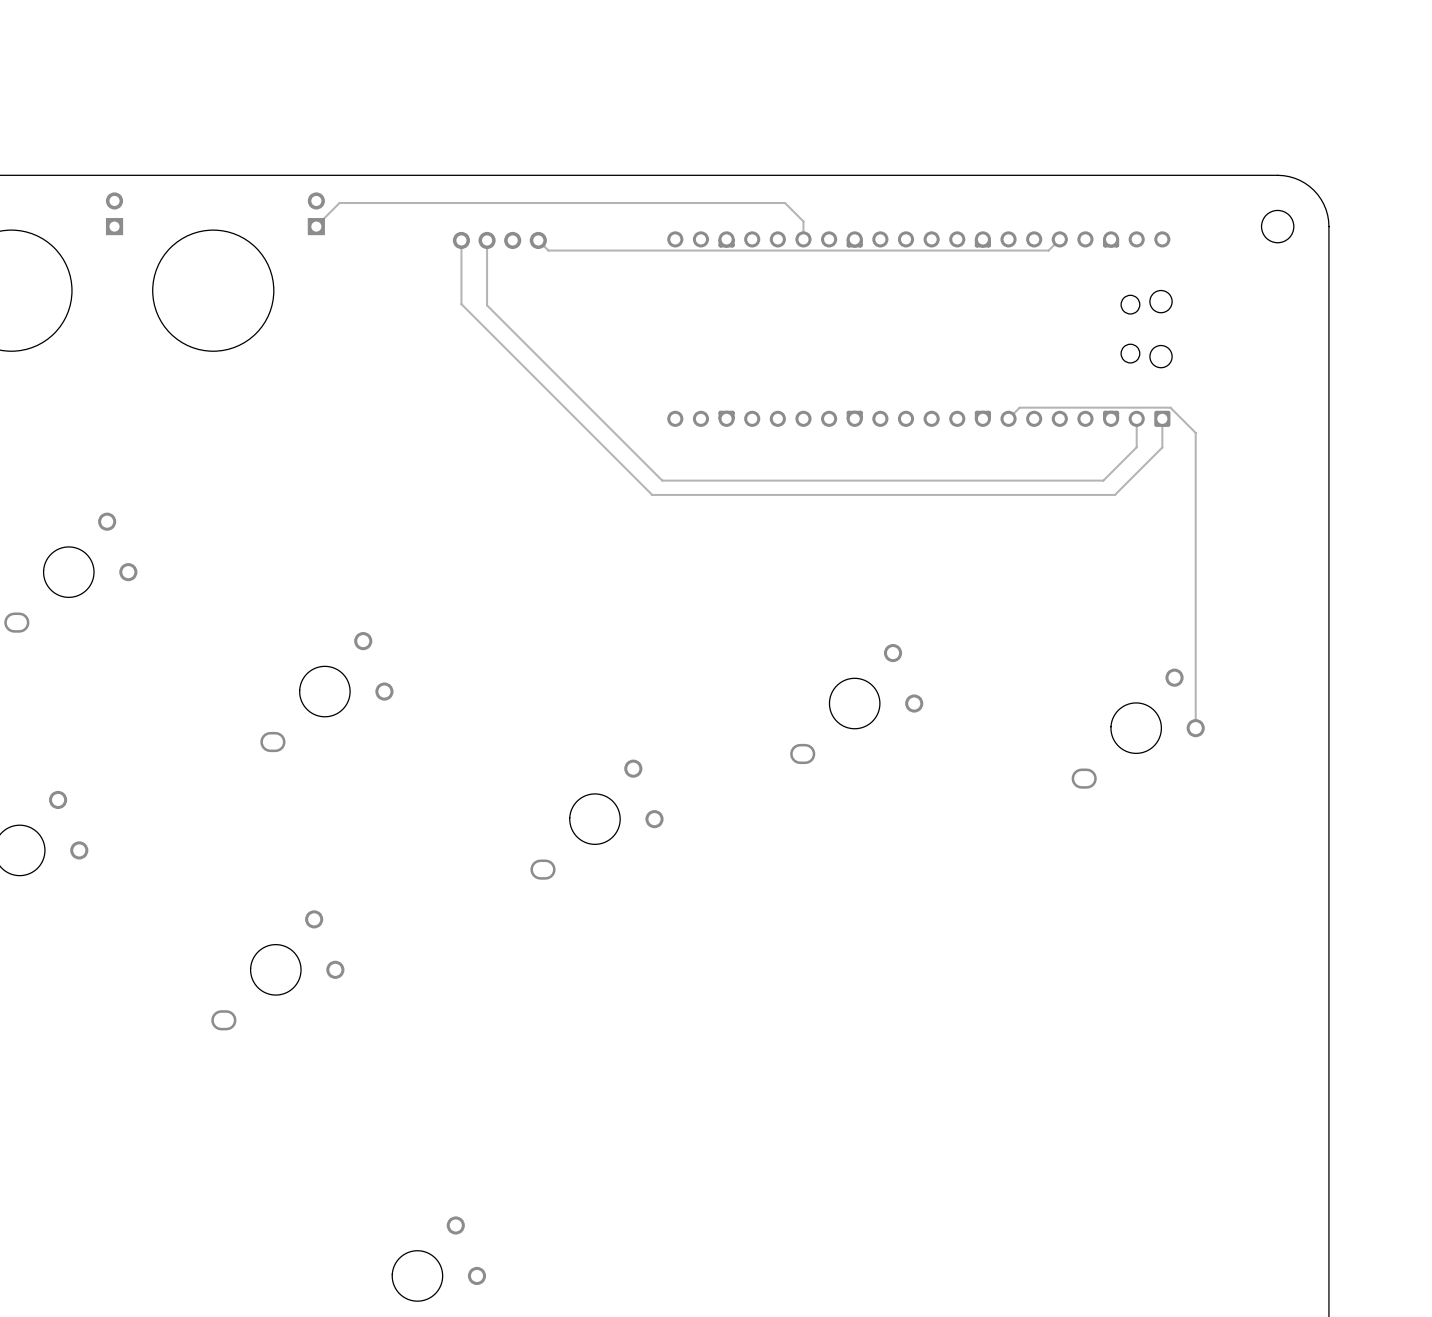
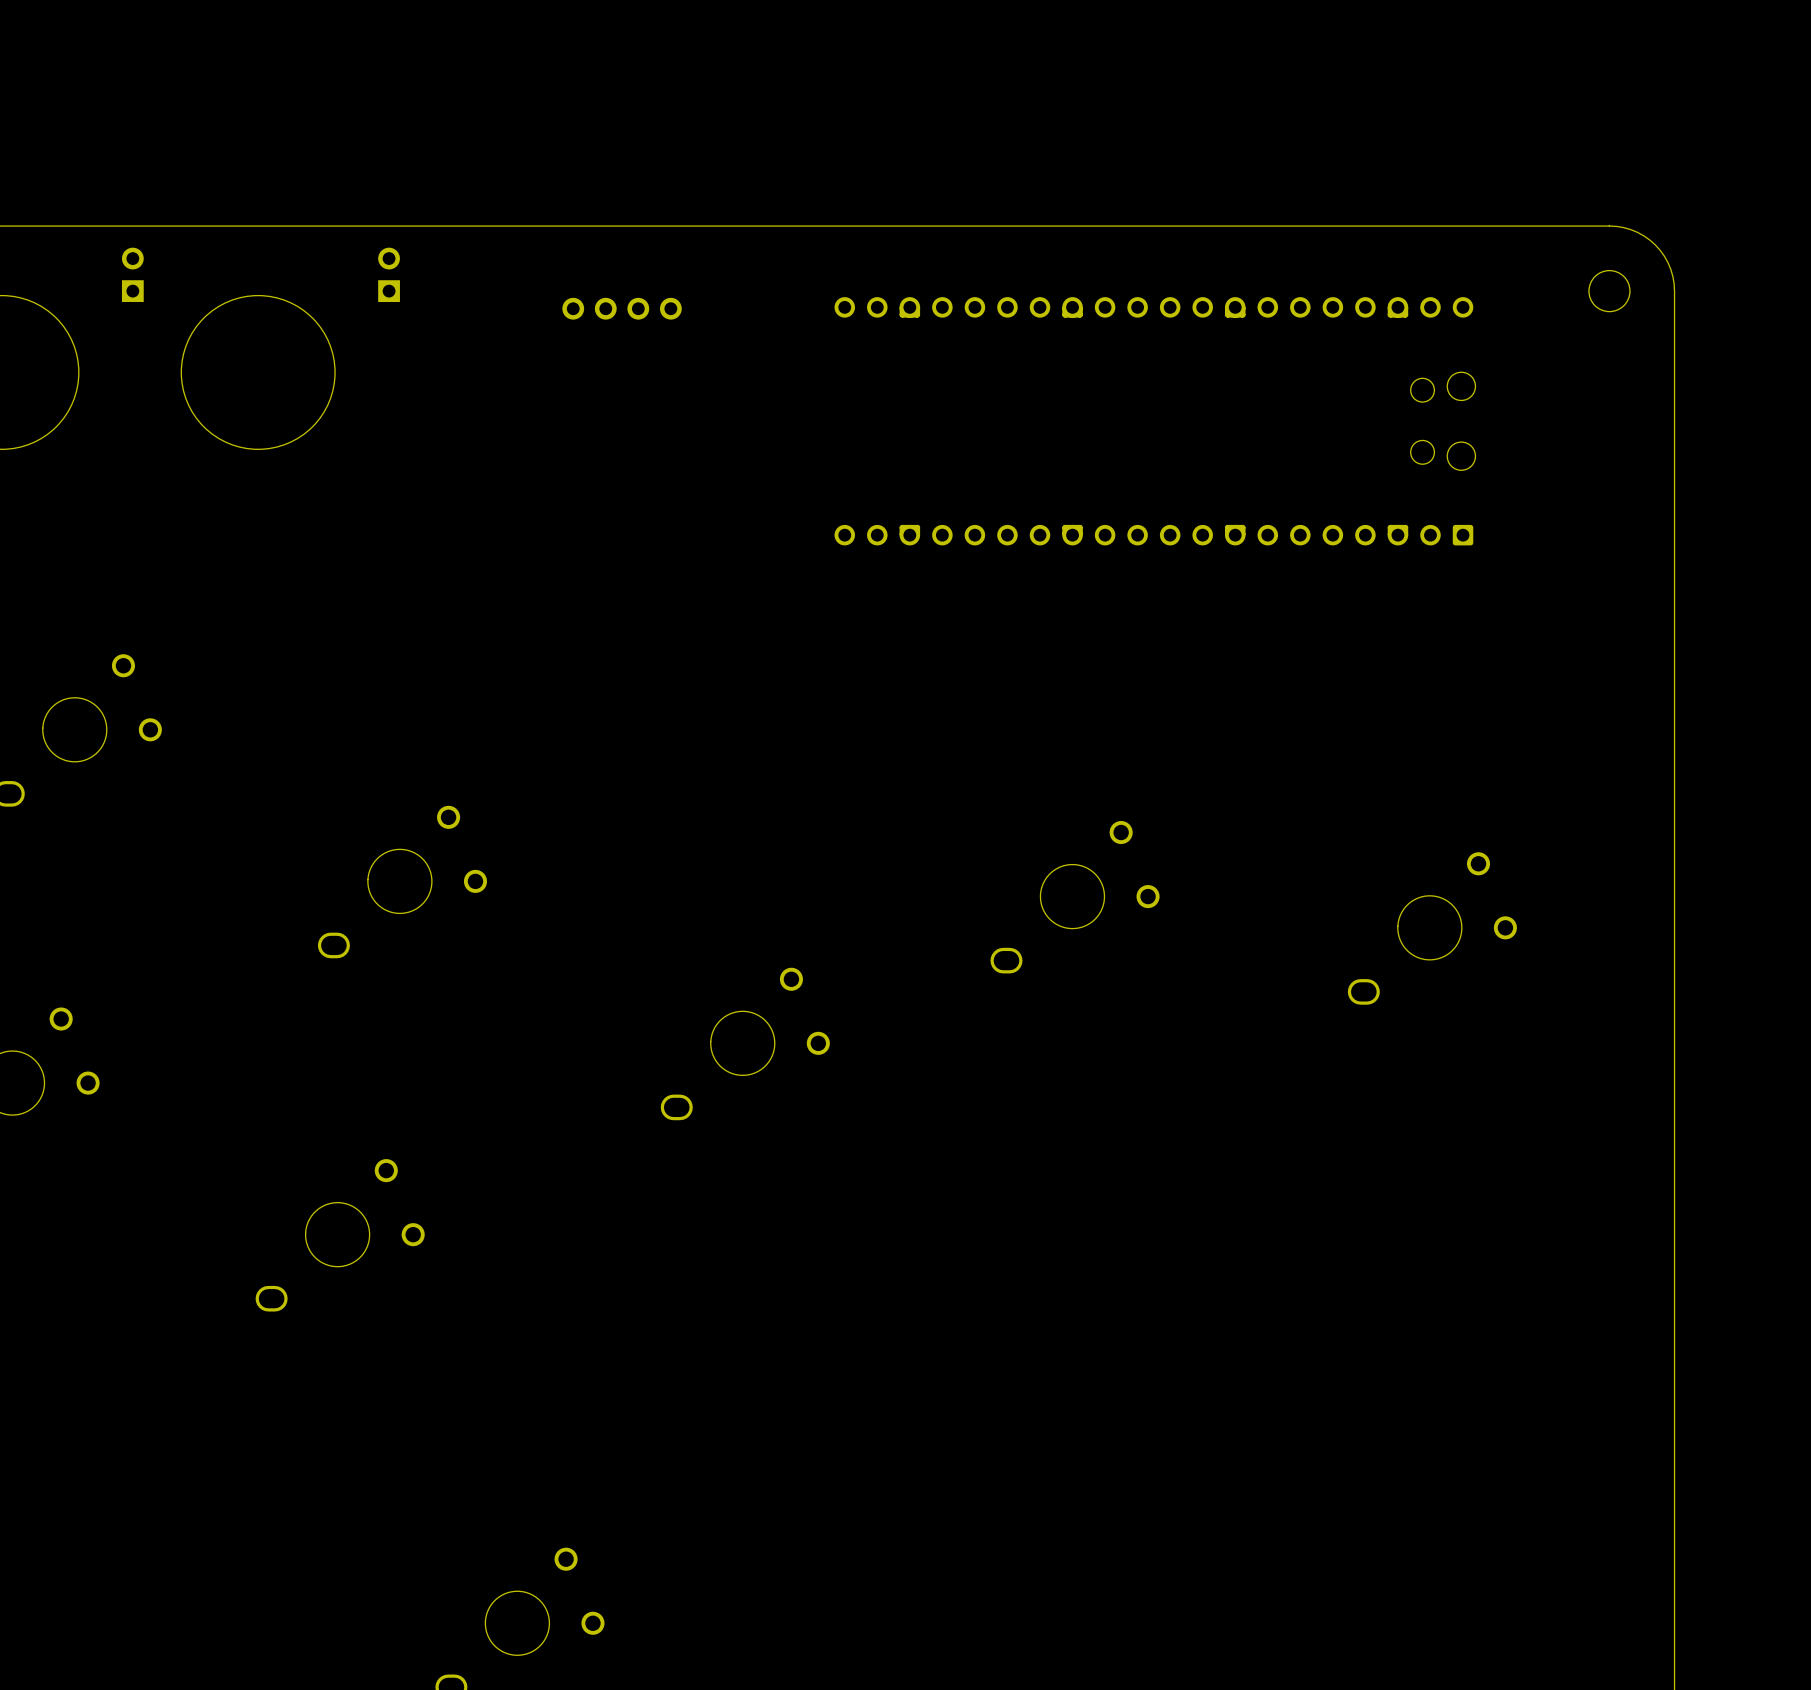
track: (316, 226) (339, 203) (785, 203) (803, 221) (803, 239) -> none
track: (1059, 239) (1048, 250) (548, 250) (538, 240) -> none
track: (461, 240) (461, 304) (652, 494) (1114, 494) (1162, 447) (1162, 418) -> none
track: (487, 240) (487, 305) (662, 480) (1103, 480) (1136, 447) (1136, 418) -> none
track: (1008, 418) (1019, 407) (1170, 407) (1195, 432) (1195, 728) -> none

